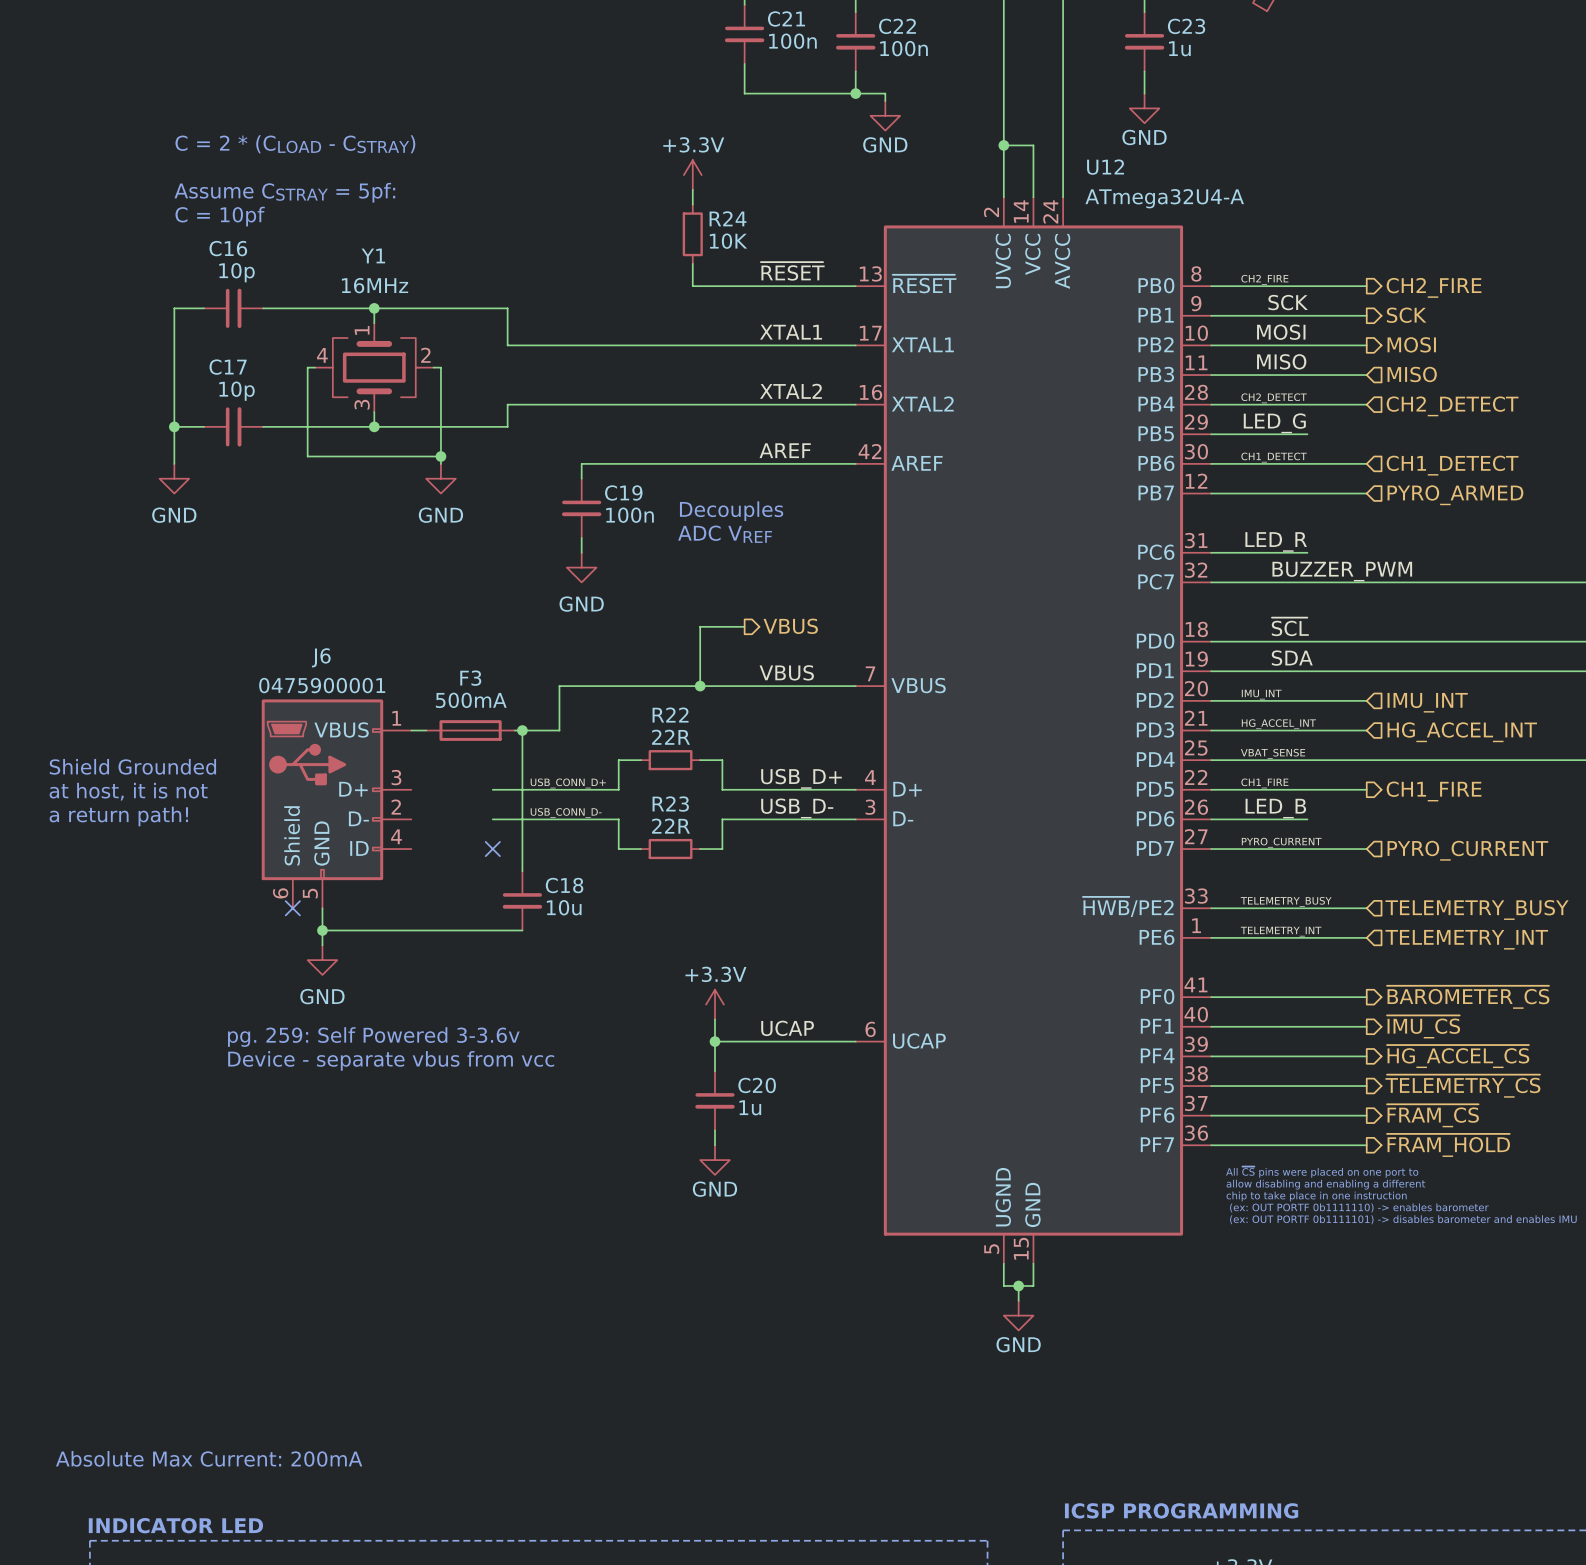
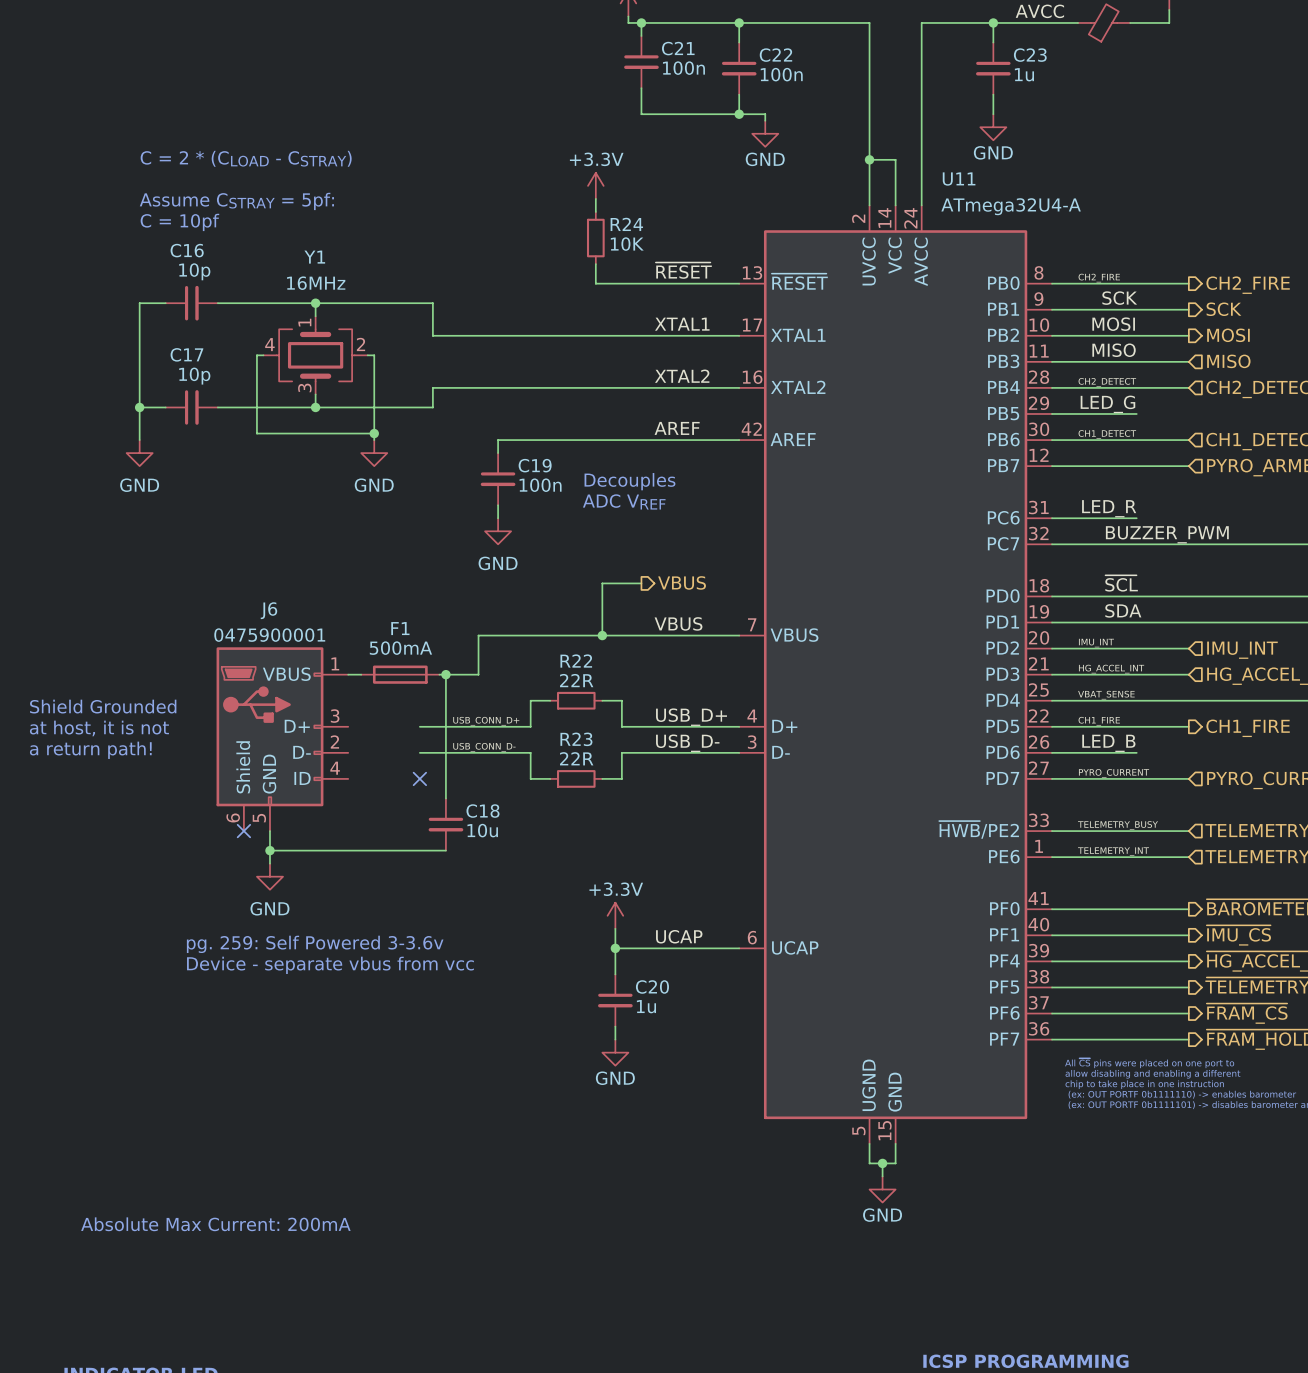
U12 name: U12 (1105, 167) -> U11 (959, 179)
F3 name: F3 (470, 678) -> F1 (400, 628)
text position: Absolute Max Current: 200mA (209, 1458) -> Absolute Max Current: 200mA (215, 1224)

